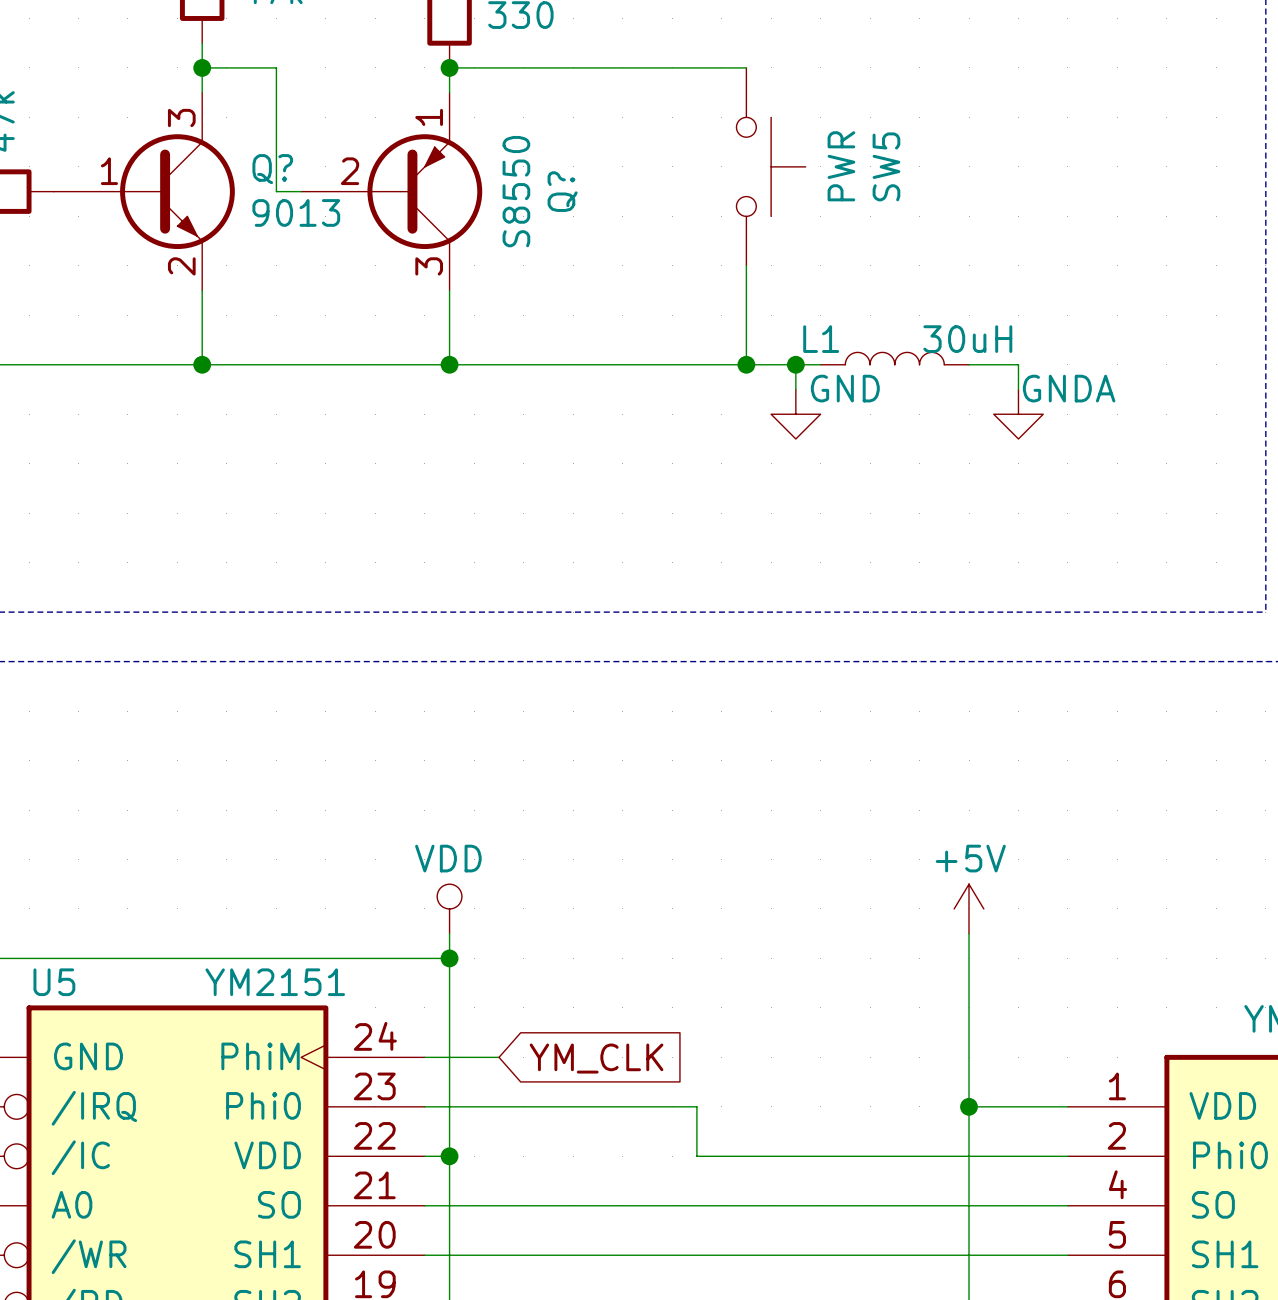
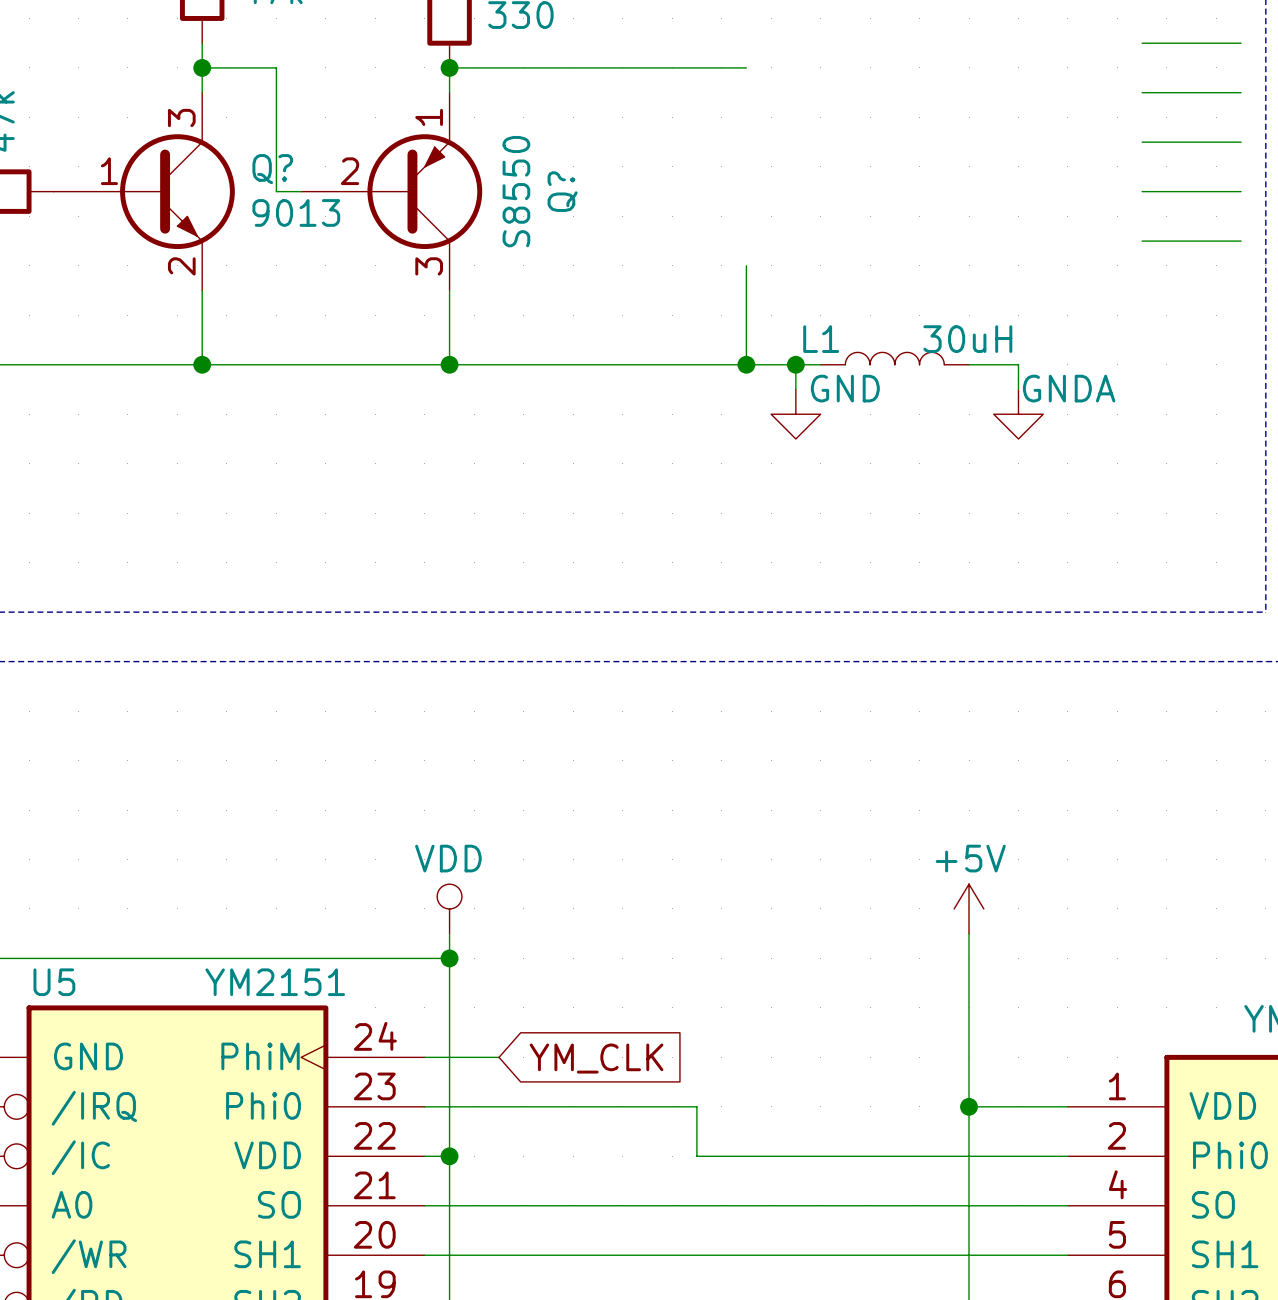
wire: none -> (1142, 43) (1241, 43)
wire: none -> (1142, 92) (1241, 92)
wire: none -> (1142, 142) (1241, 142)
SW5: PWR (771, 166) -> none
wire: none -> (1142, 191) (1241, 191)
wire: none -> (1142, 241) (1241, 241)

